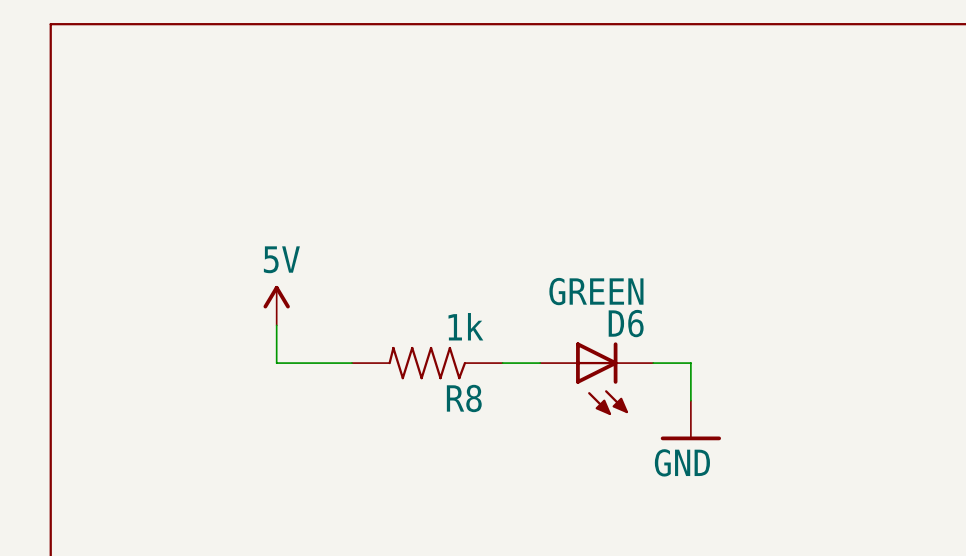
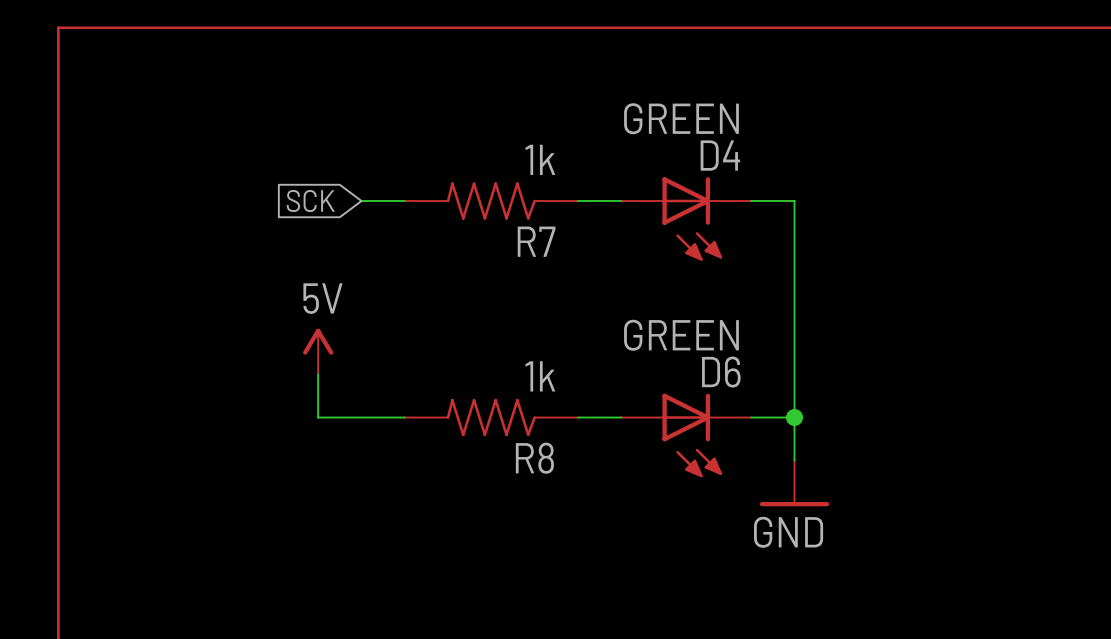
global label: none -> SCK (310, 201)
wire: none -> (361, 201) (404, 201)
R7: none -> 1k (491, 201)
wire: none -> (577, 201) (621, 201)
wire: none -> (751, 201) (794, 201) (794, 417)
D4: none -> GREEN (686, 218)
junction: none -> (794, 417)

